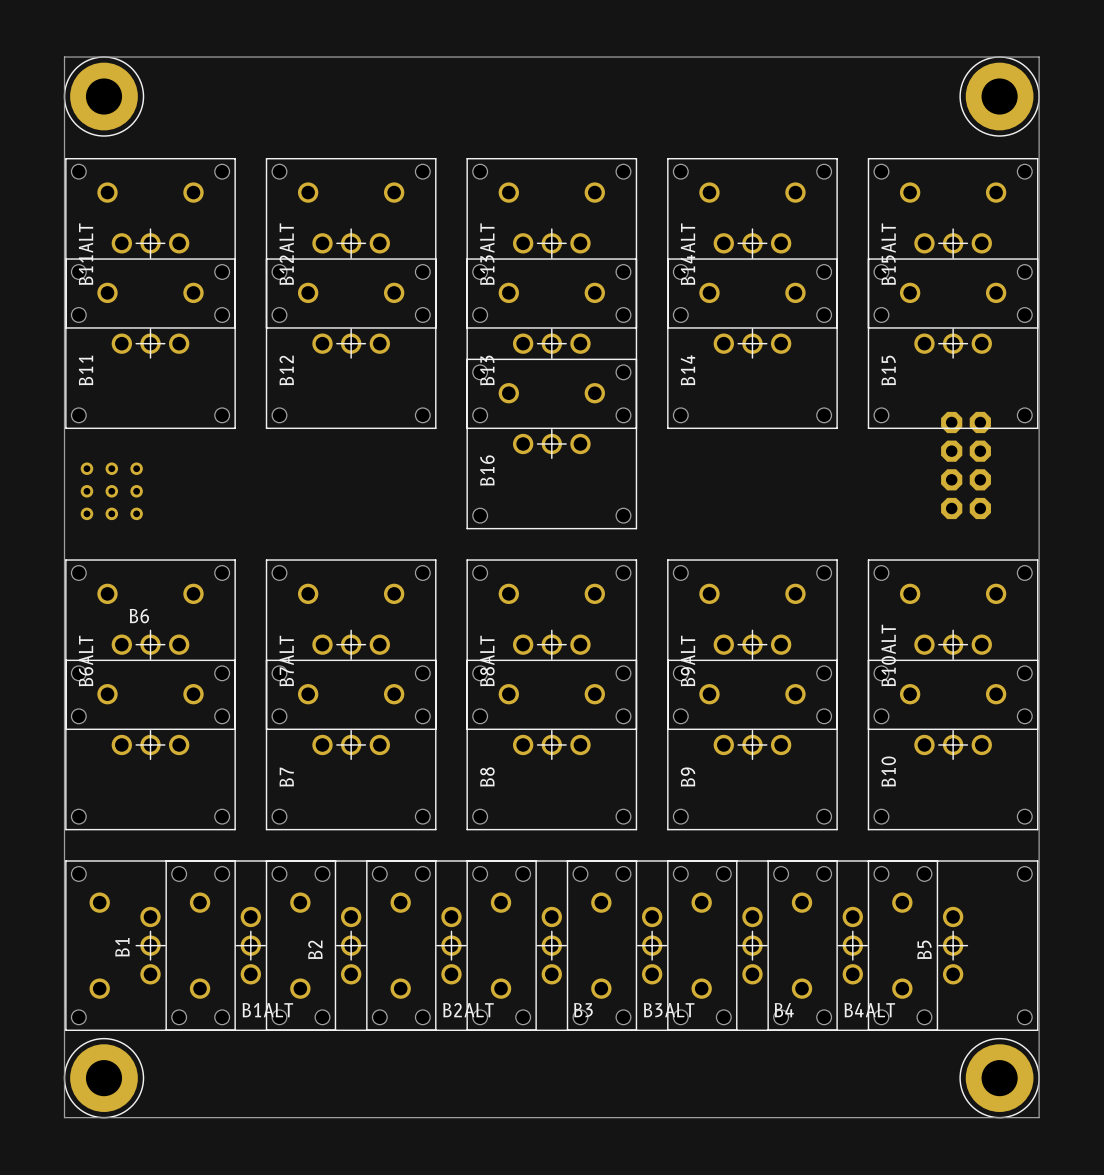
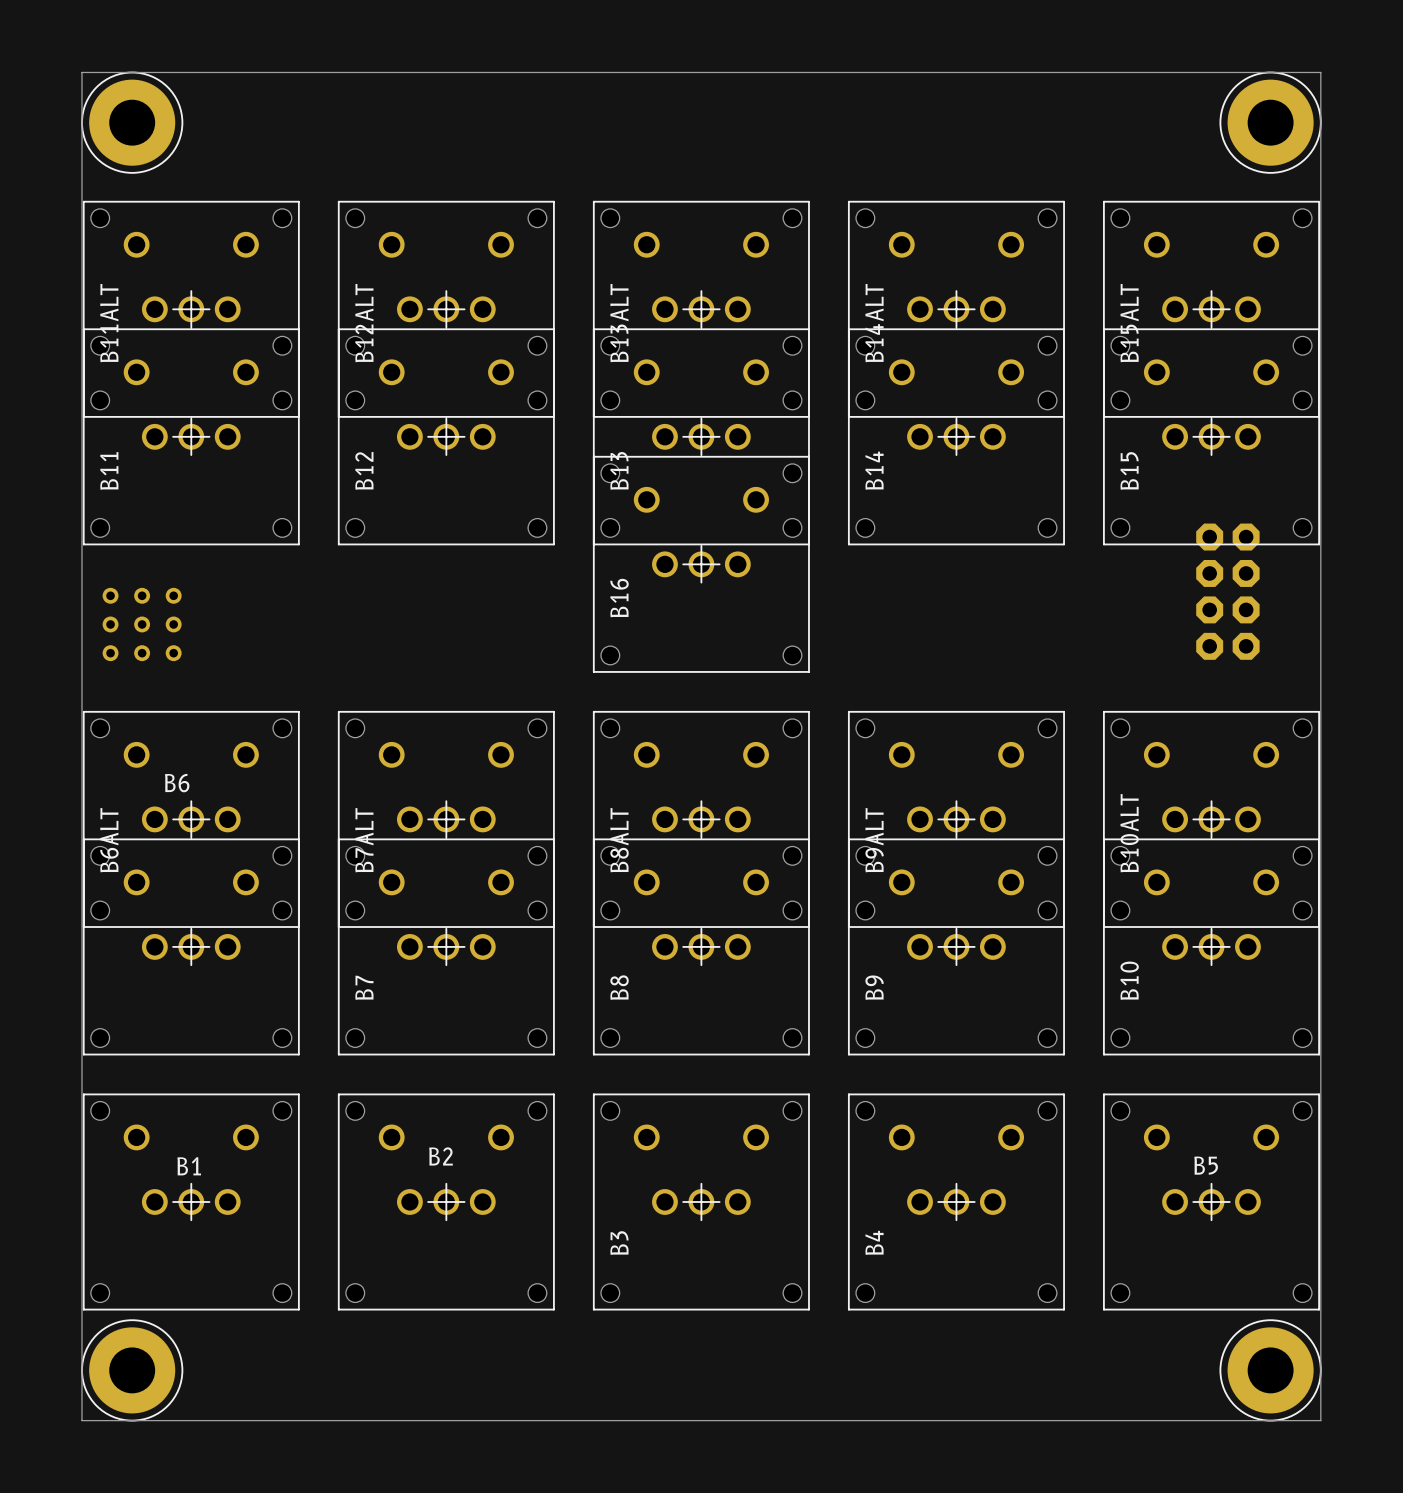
B1 rotation: 0° (150, 945) -> 90° clockwise (191, 1201)
B1ALT: (250, 945) -> none
B2 rotation: 0° (351, 945) -> 90° clockwise (446, 1201)
B2ALT: (451, 945) -> none
B3 rotation: 0° (551, 945) -> 90° clockwise (701, 1201)
B3ALT: (652, 945) -> none
B4 rotation: 0° (752, 945) -> 90° clockwise (956, 1201)
B4ALT: (852, 945) -> none
B5 rotation: 0° (953, 945) -> 90° clockwise (1211, 1201)

